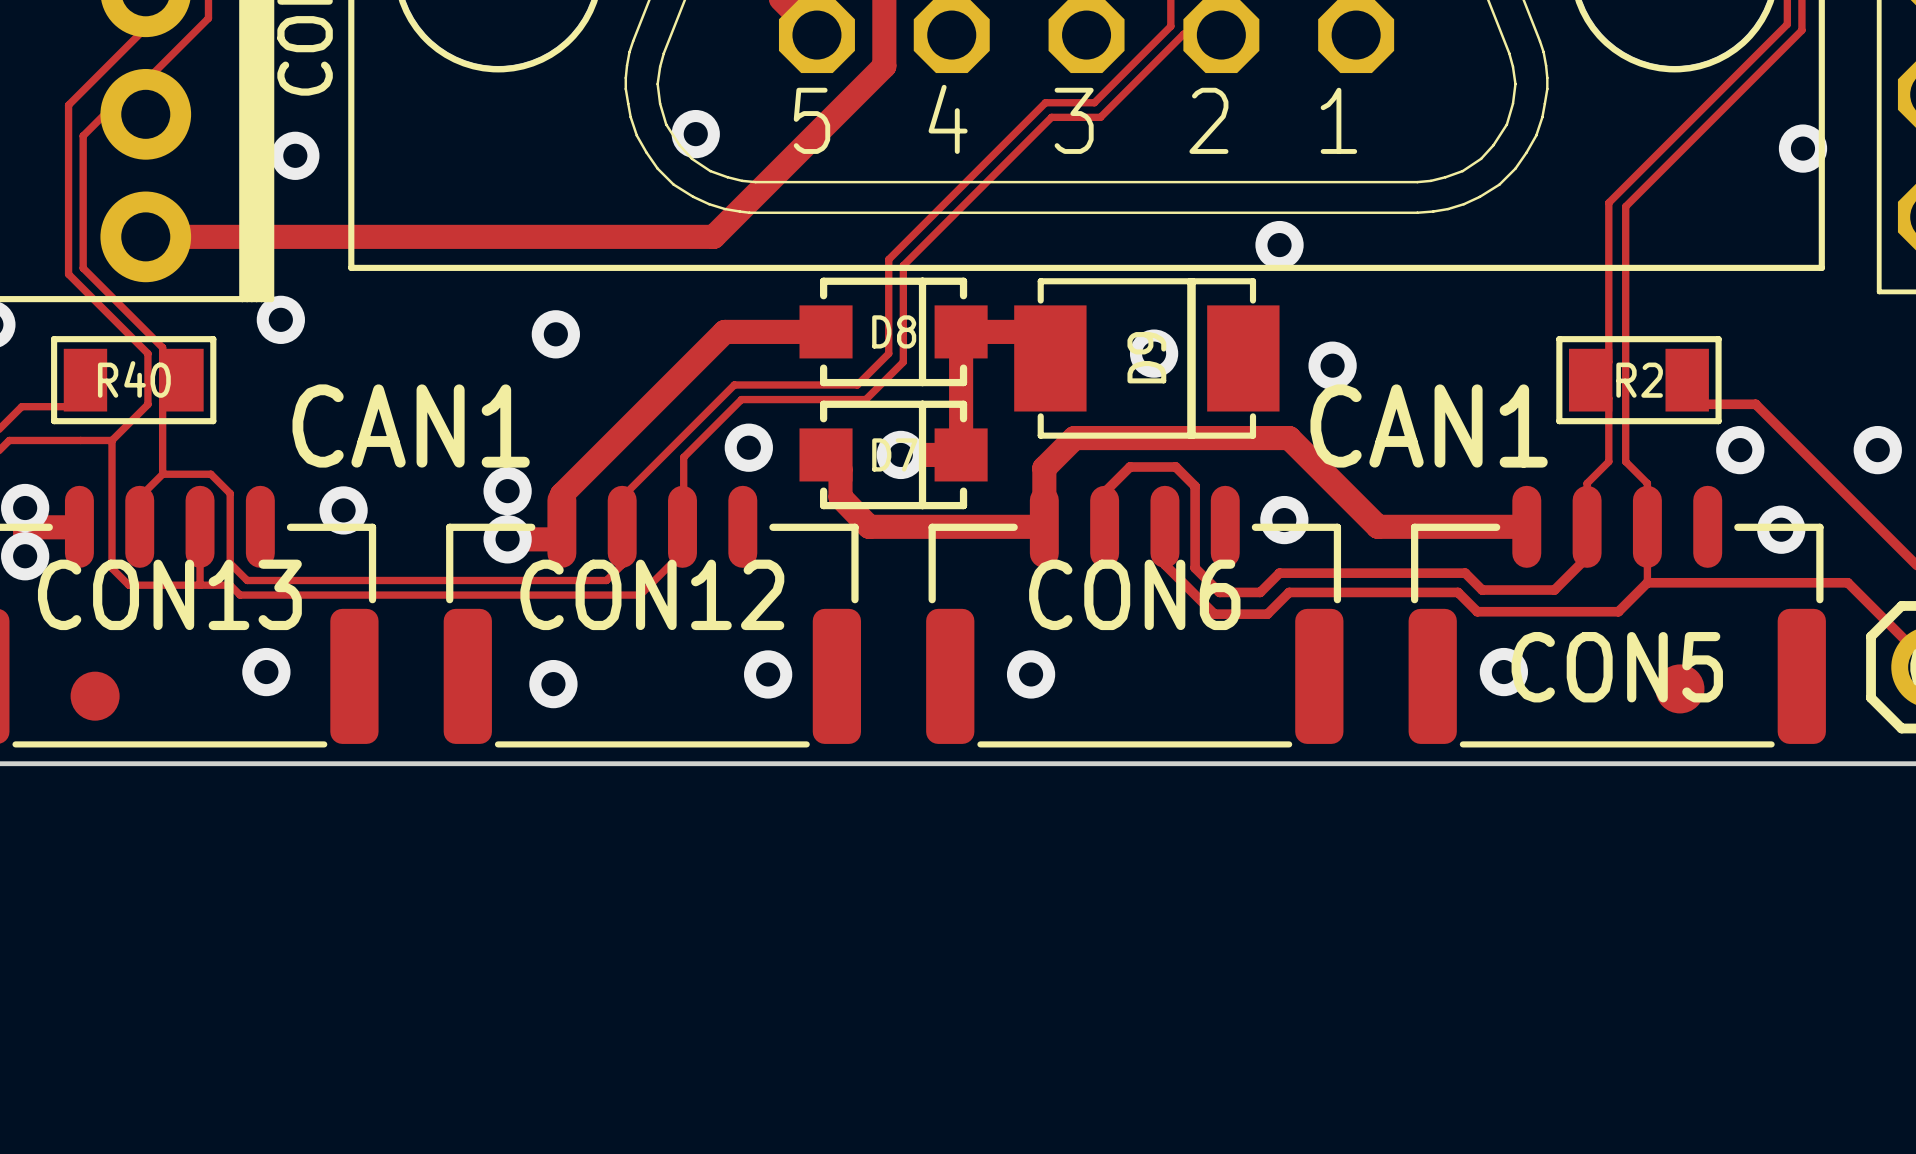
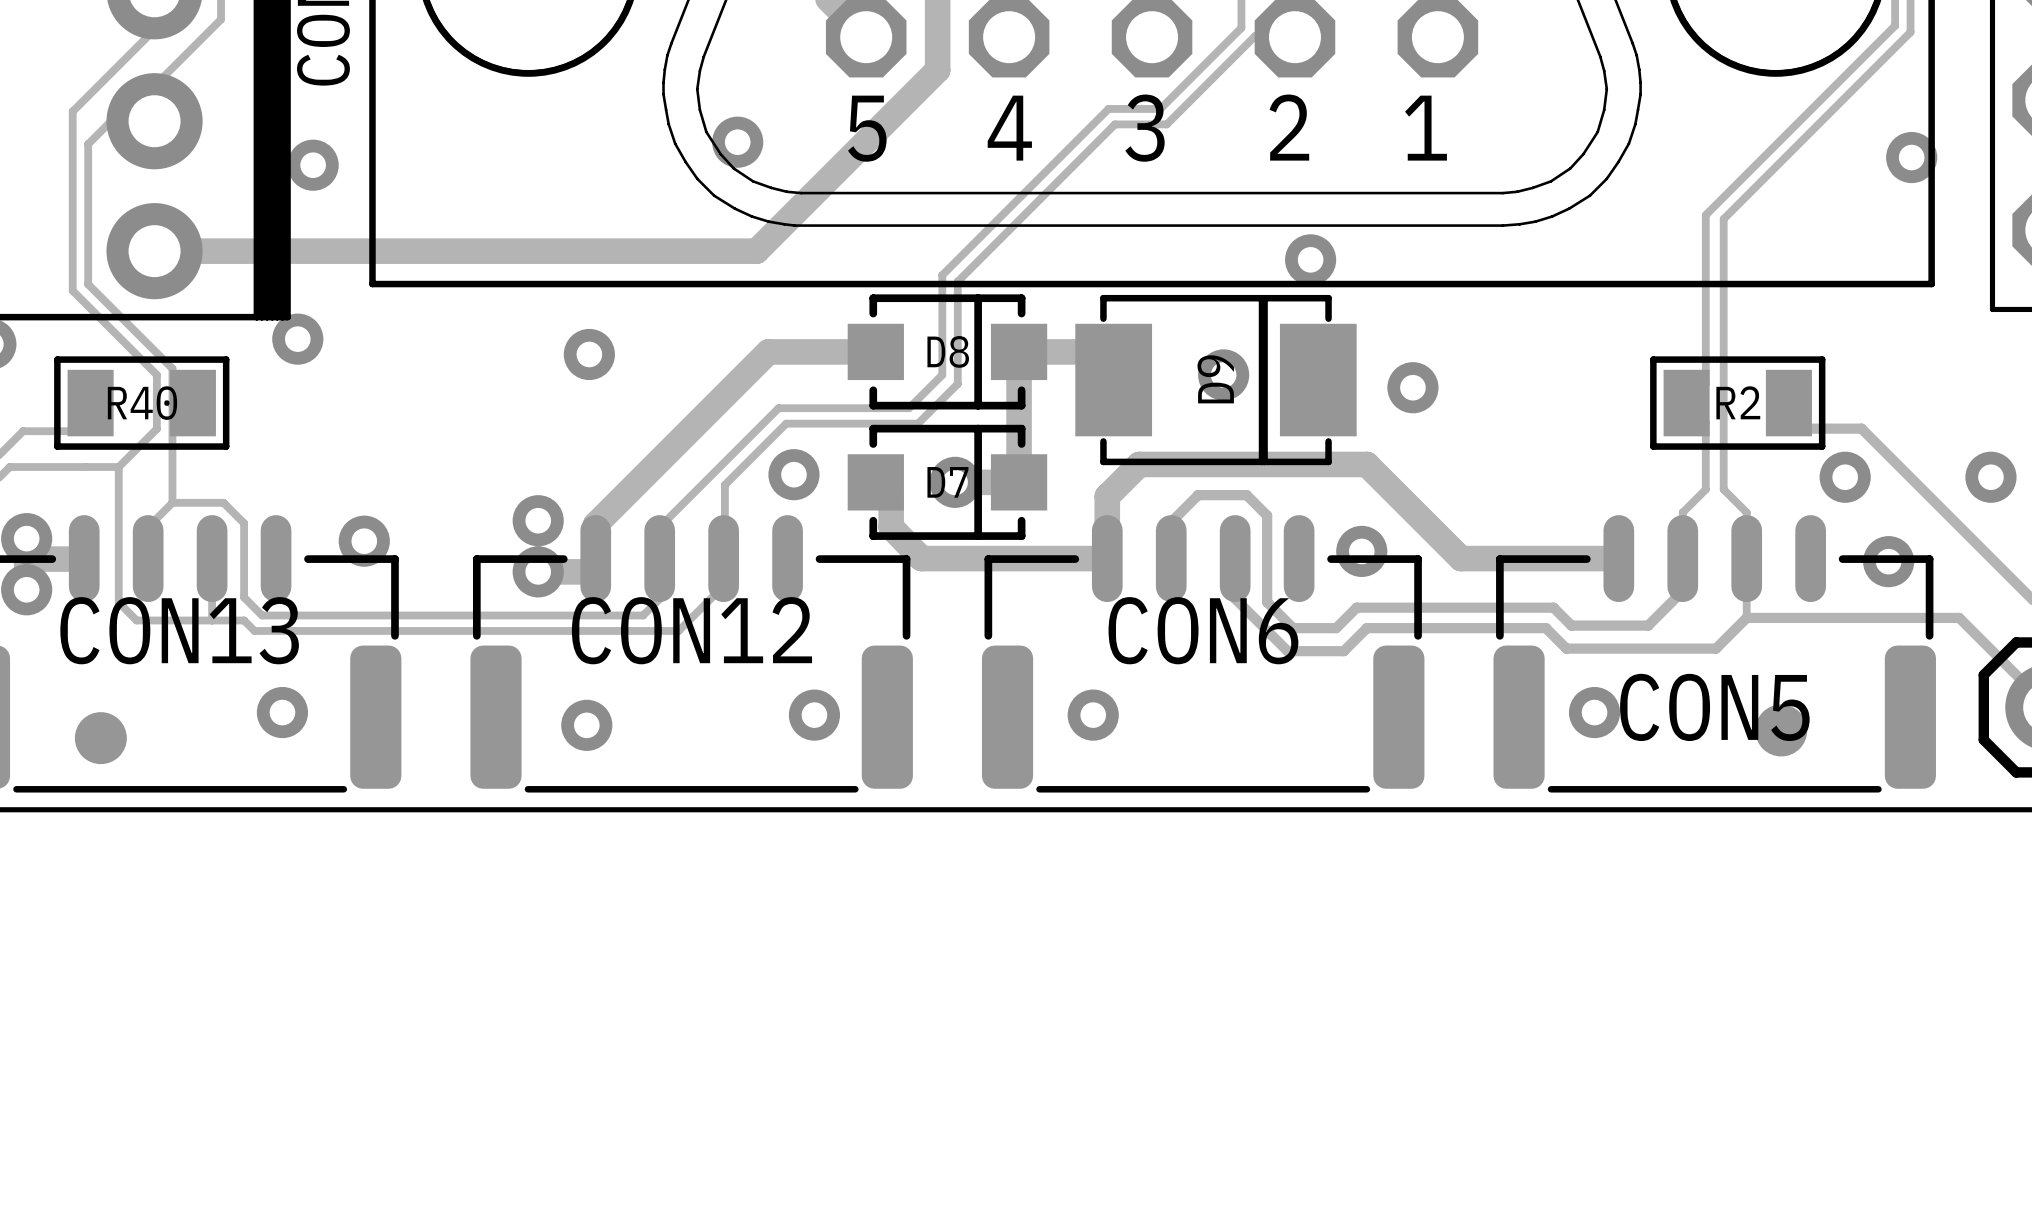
via position: (1279, 245) -> (1310, 259)
text: CAN1 (411, 425) -> none
text: CAN1 (1429, 425) -> none

